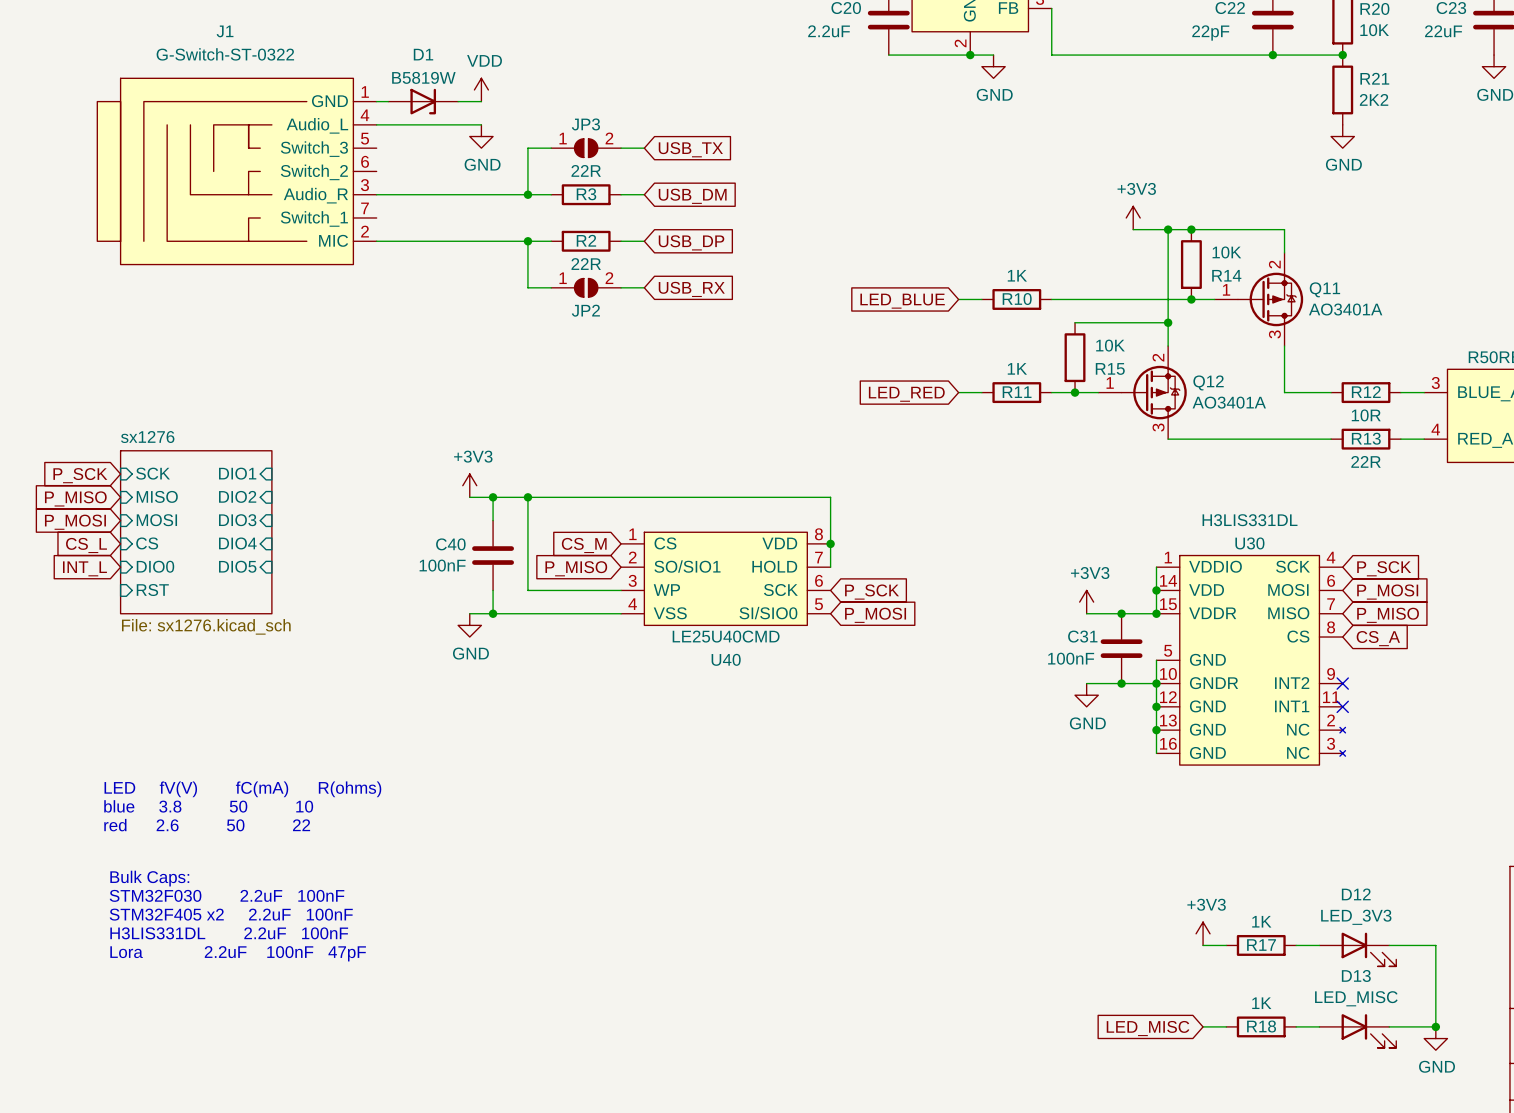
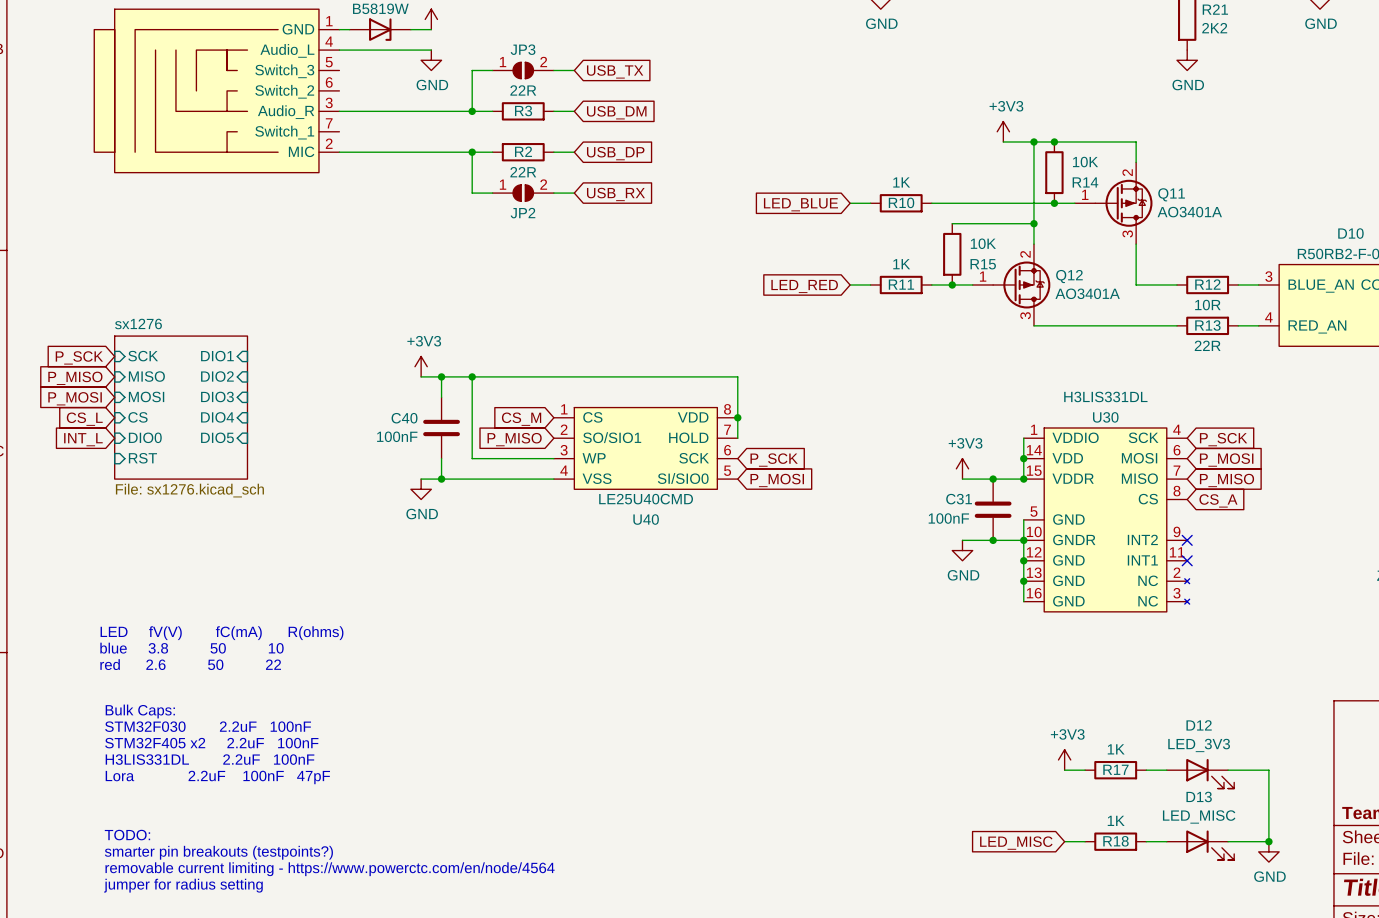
text: none -> TODO: (127, 835)
text: none -> smarter pin breakouts (testpoints?) (218, 852)
text: none -> removable current limiting - https://www.powerctc.com/en/node/4564 (330, 869)
text: none -> jumper for radius setting (183, 885)

